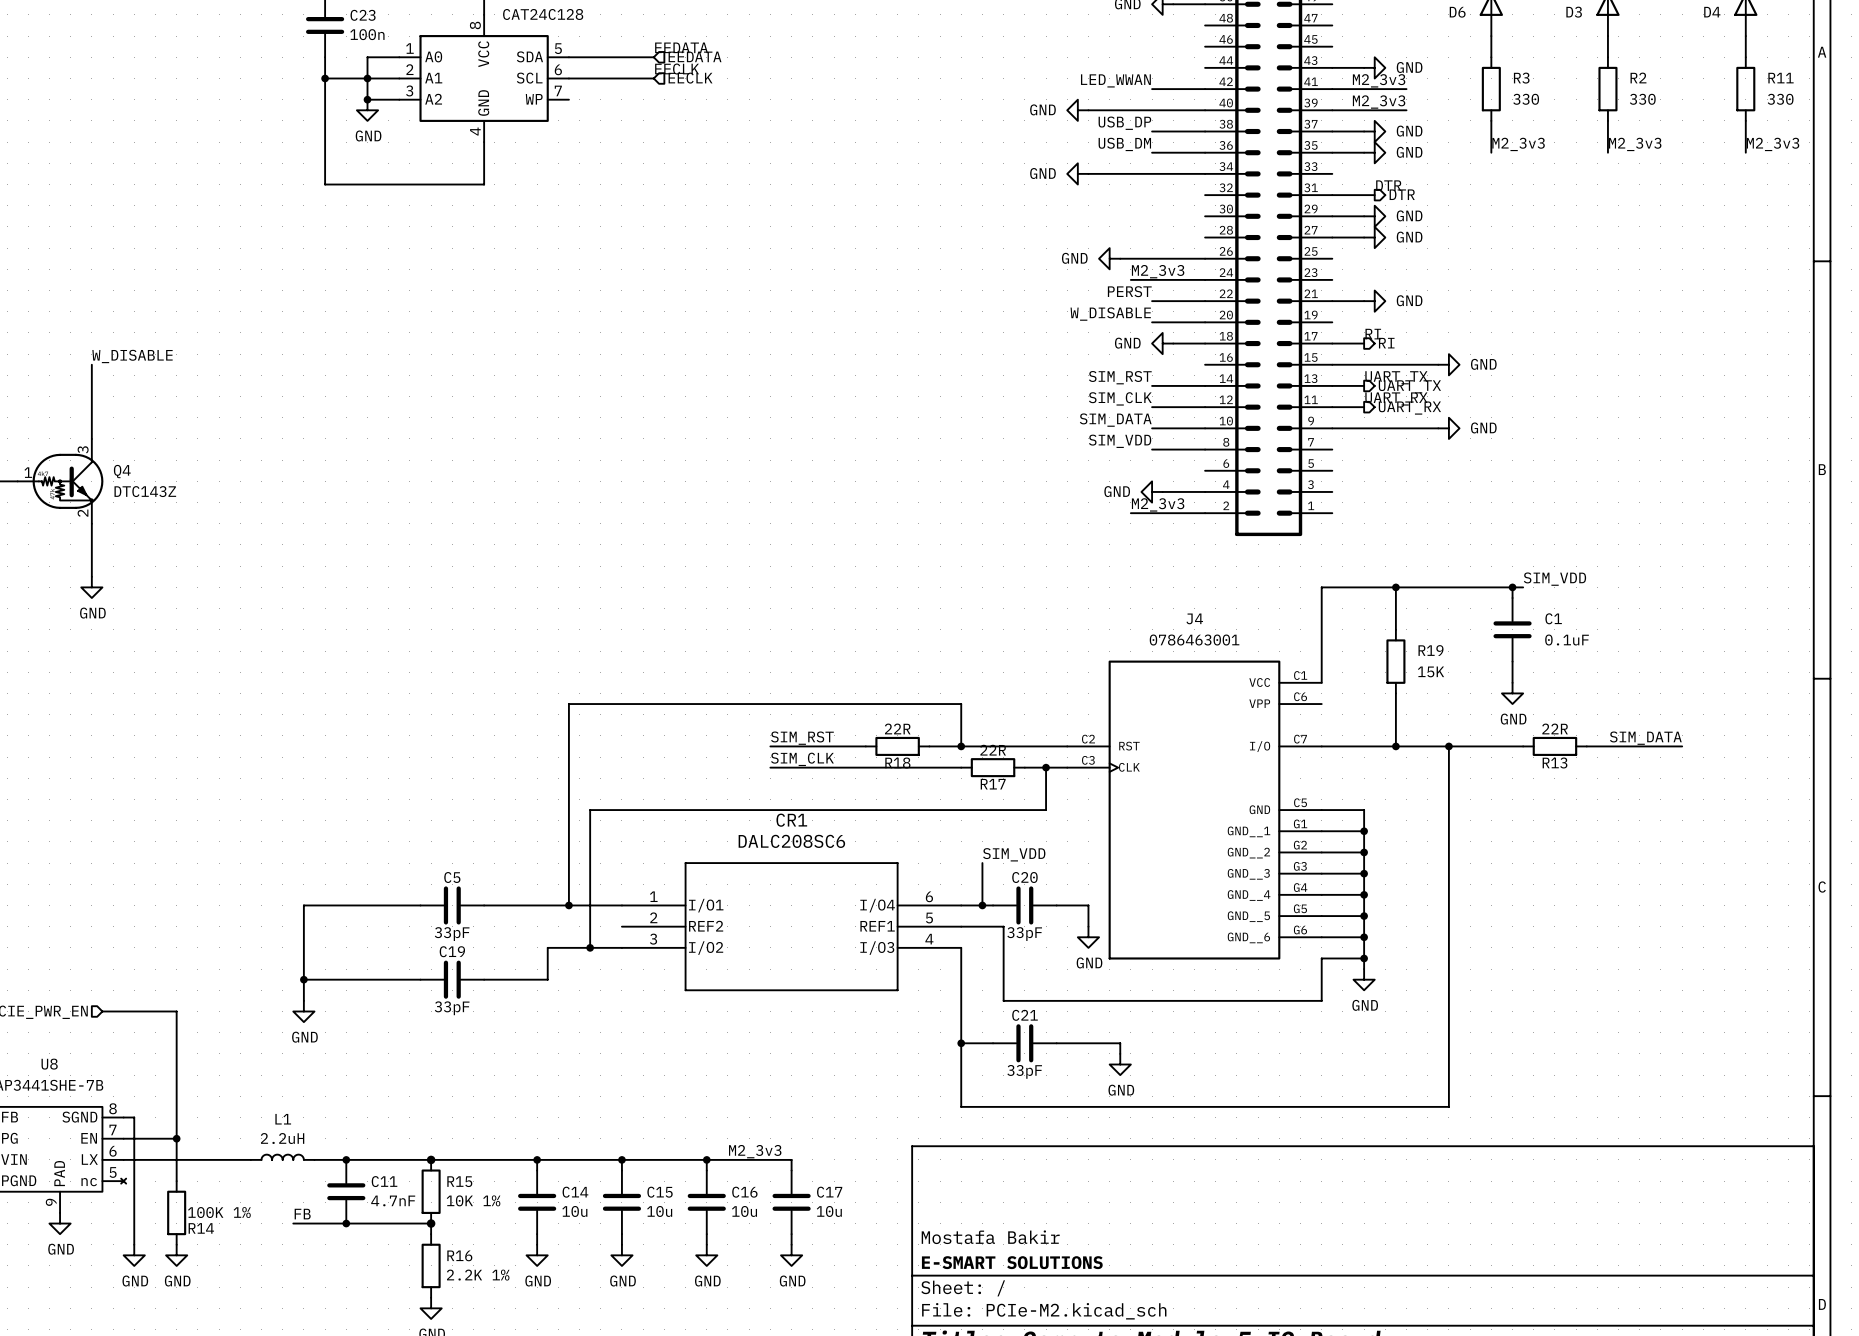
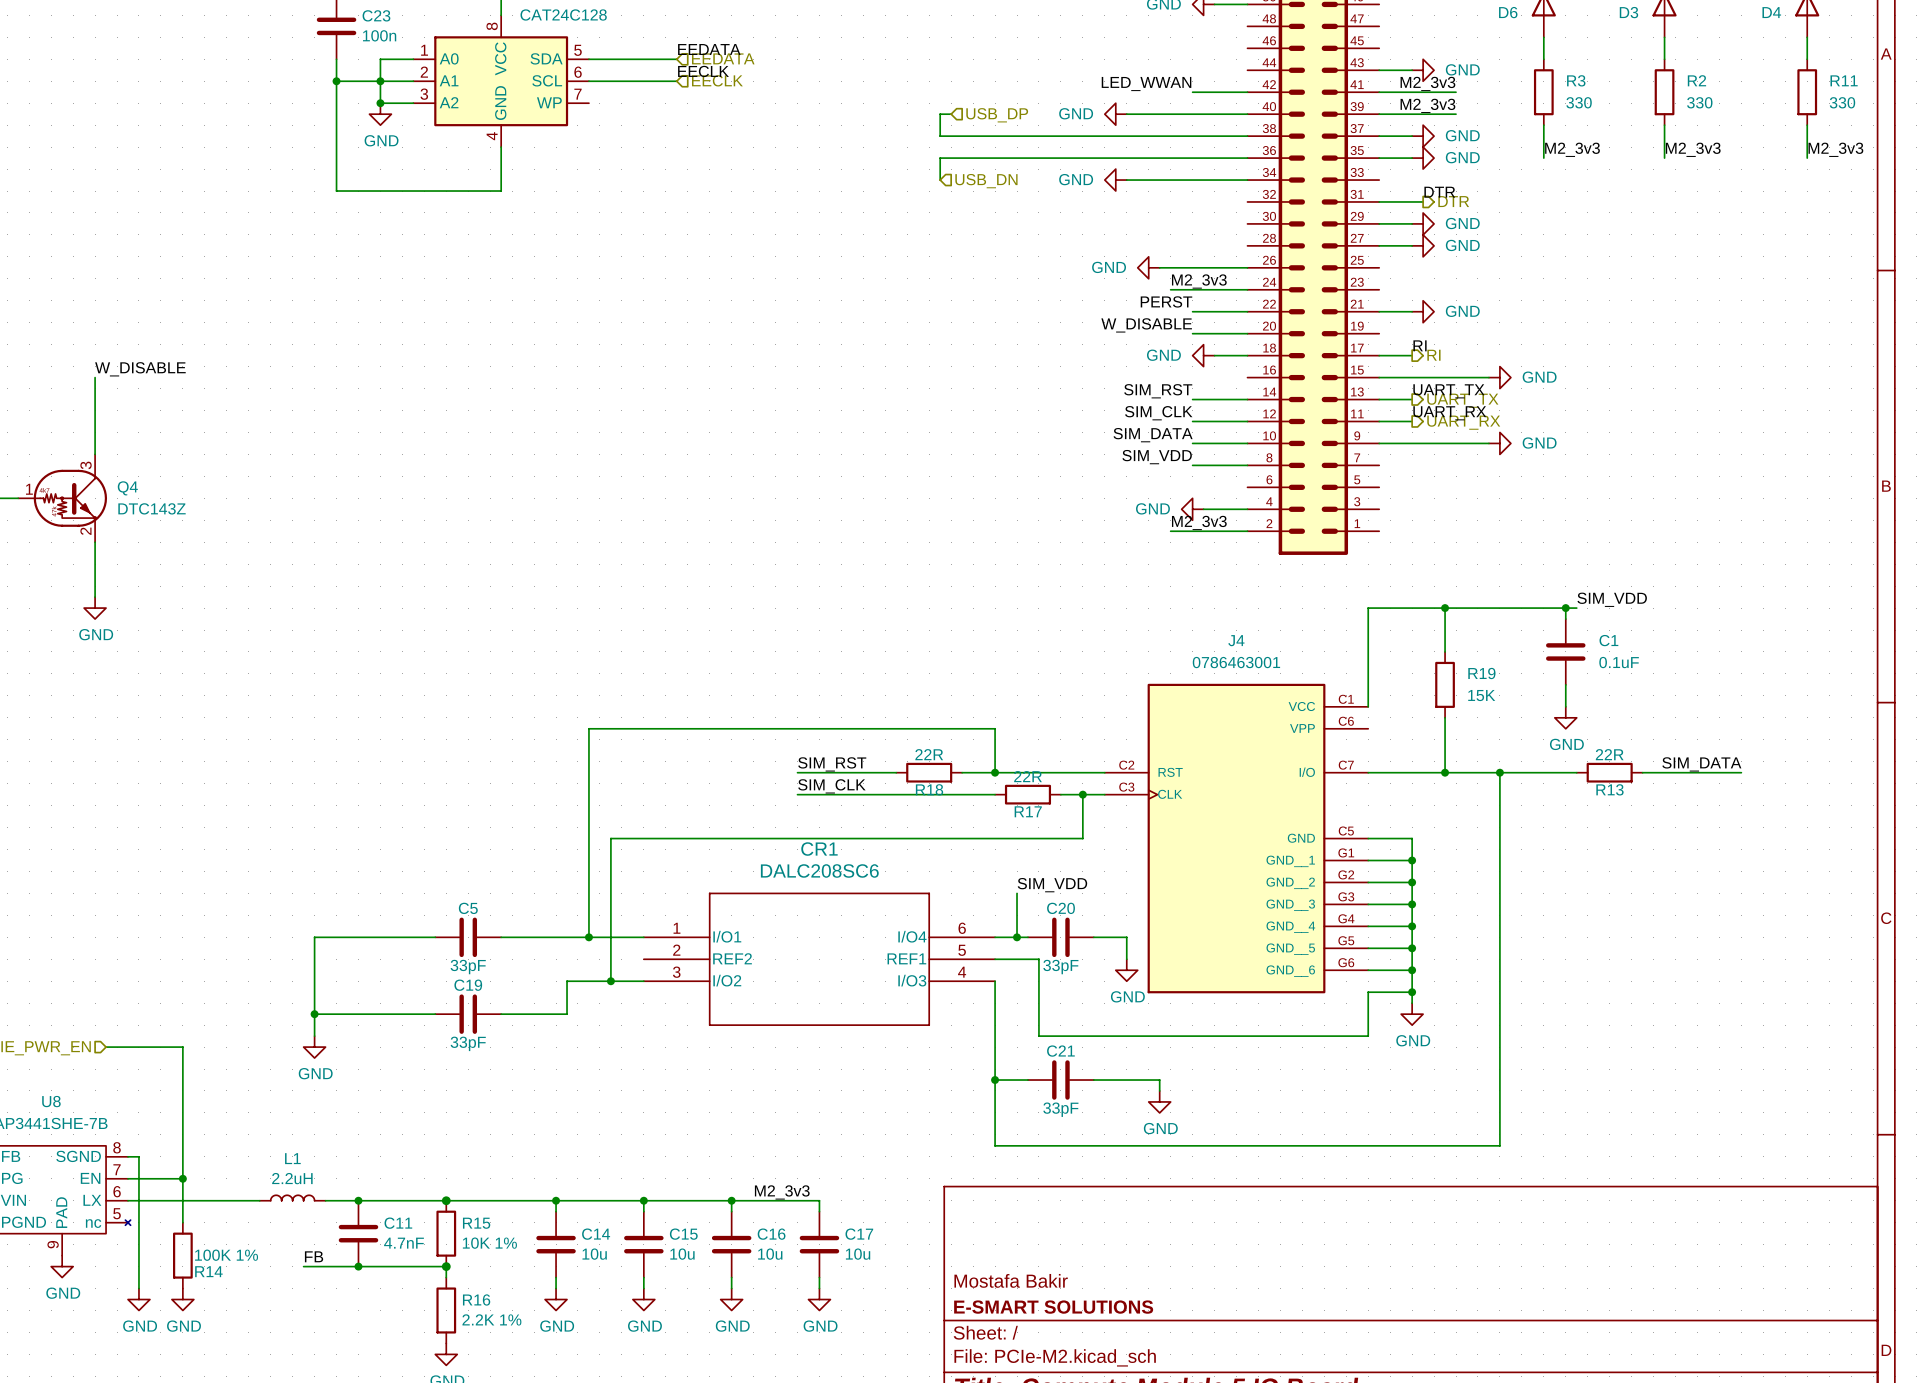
wire: none -> (951, 114) (940, 114) (940, 136) (1192, 136)
hierarchical label: none -> USB_DP (997, 115)
label: USB_DP (1124, 123) -> none
label: USB_DM (1124, 144) -> none
wire: none -> (1192, 158) (940, 158) (940, 180)
hierarchical label: none -> USB_DN (986, 181)

